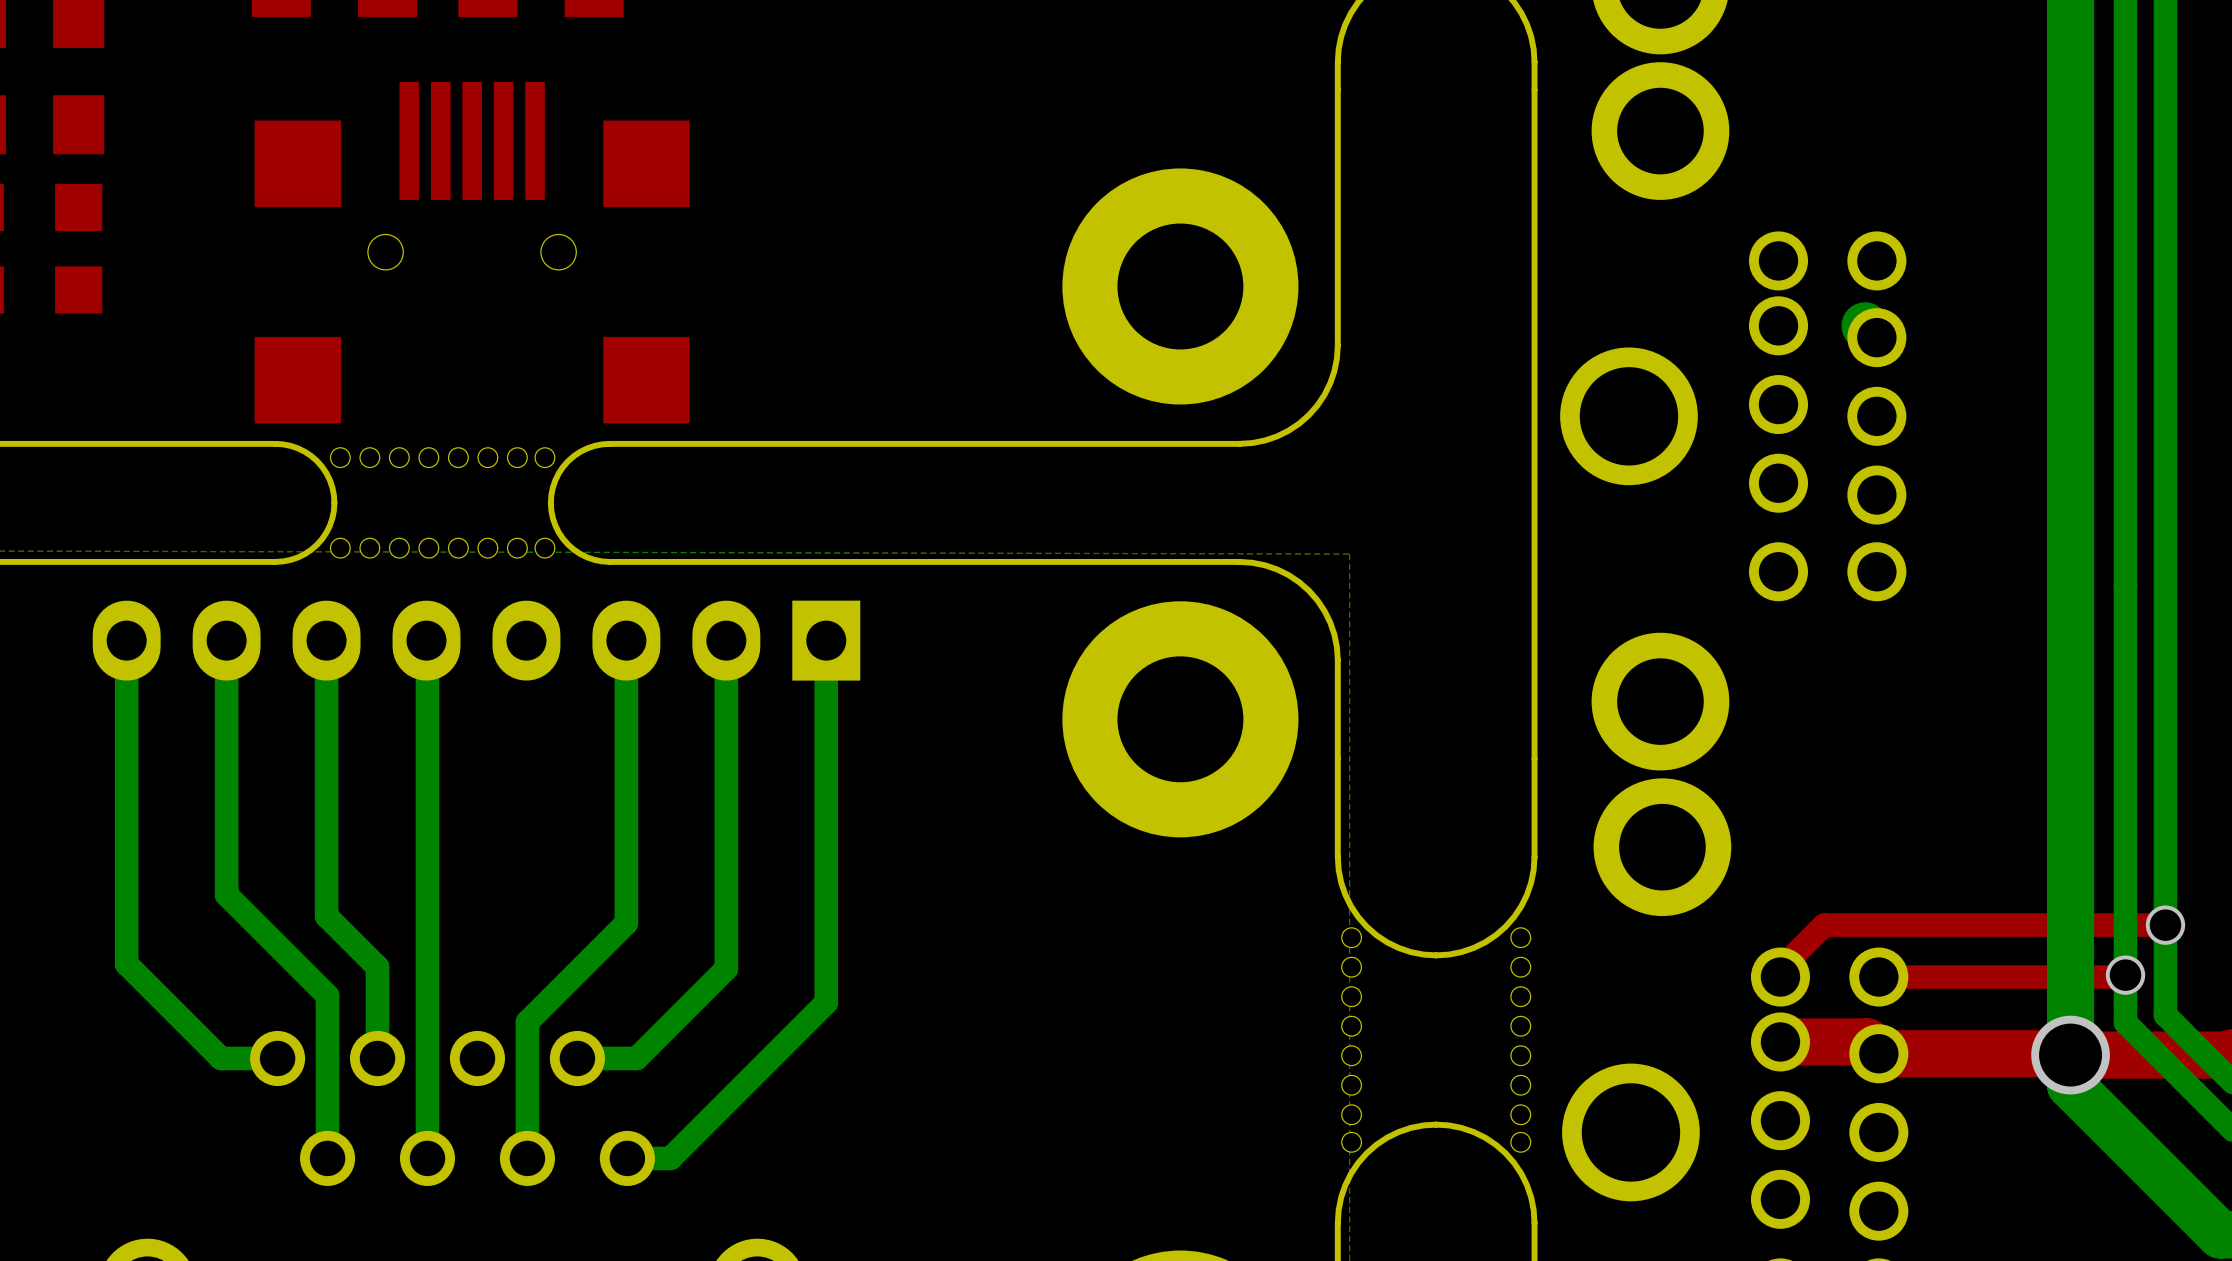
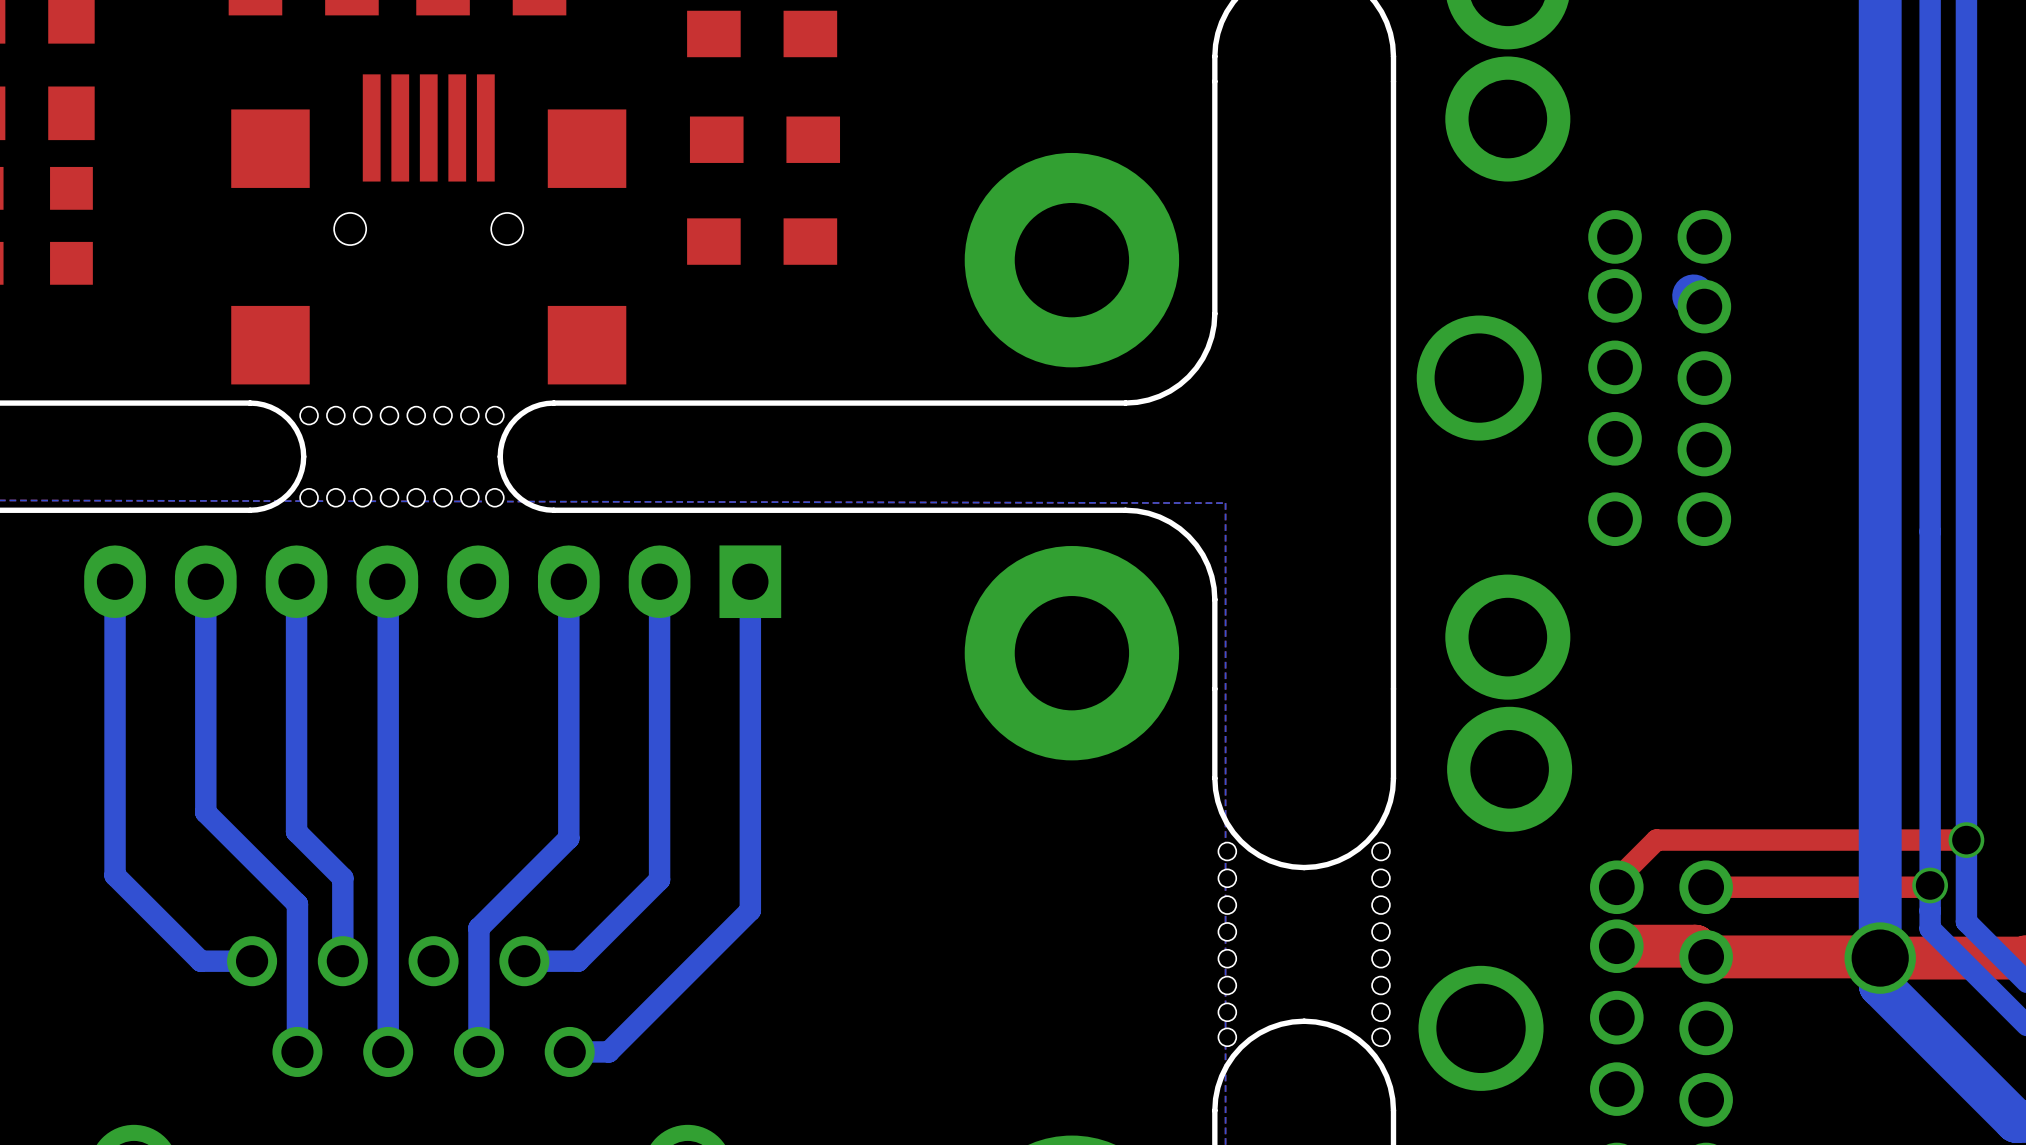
part: none -> (762, 33)
part: none -> (764, 139)
part: none -> (762, 241)

